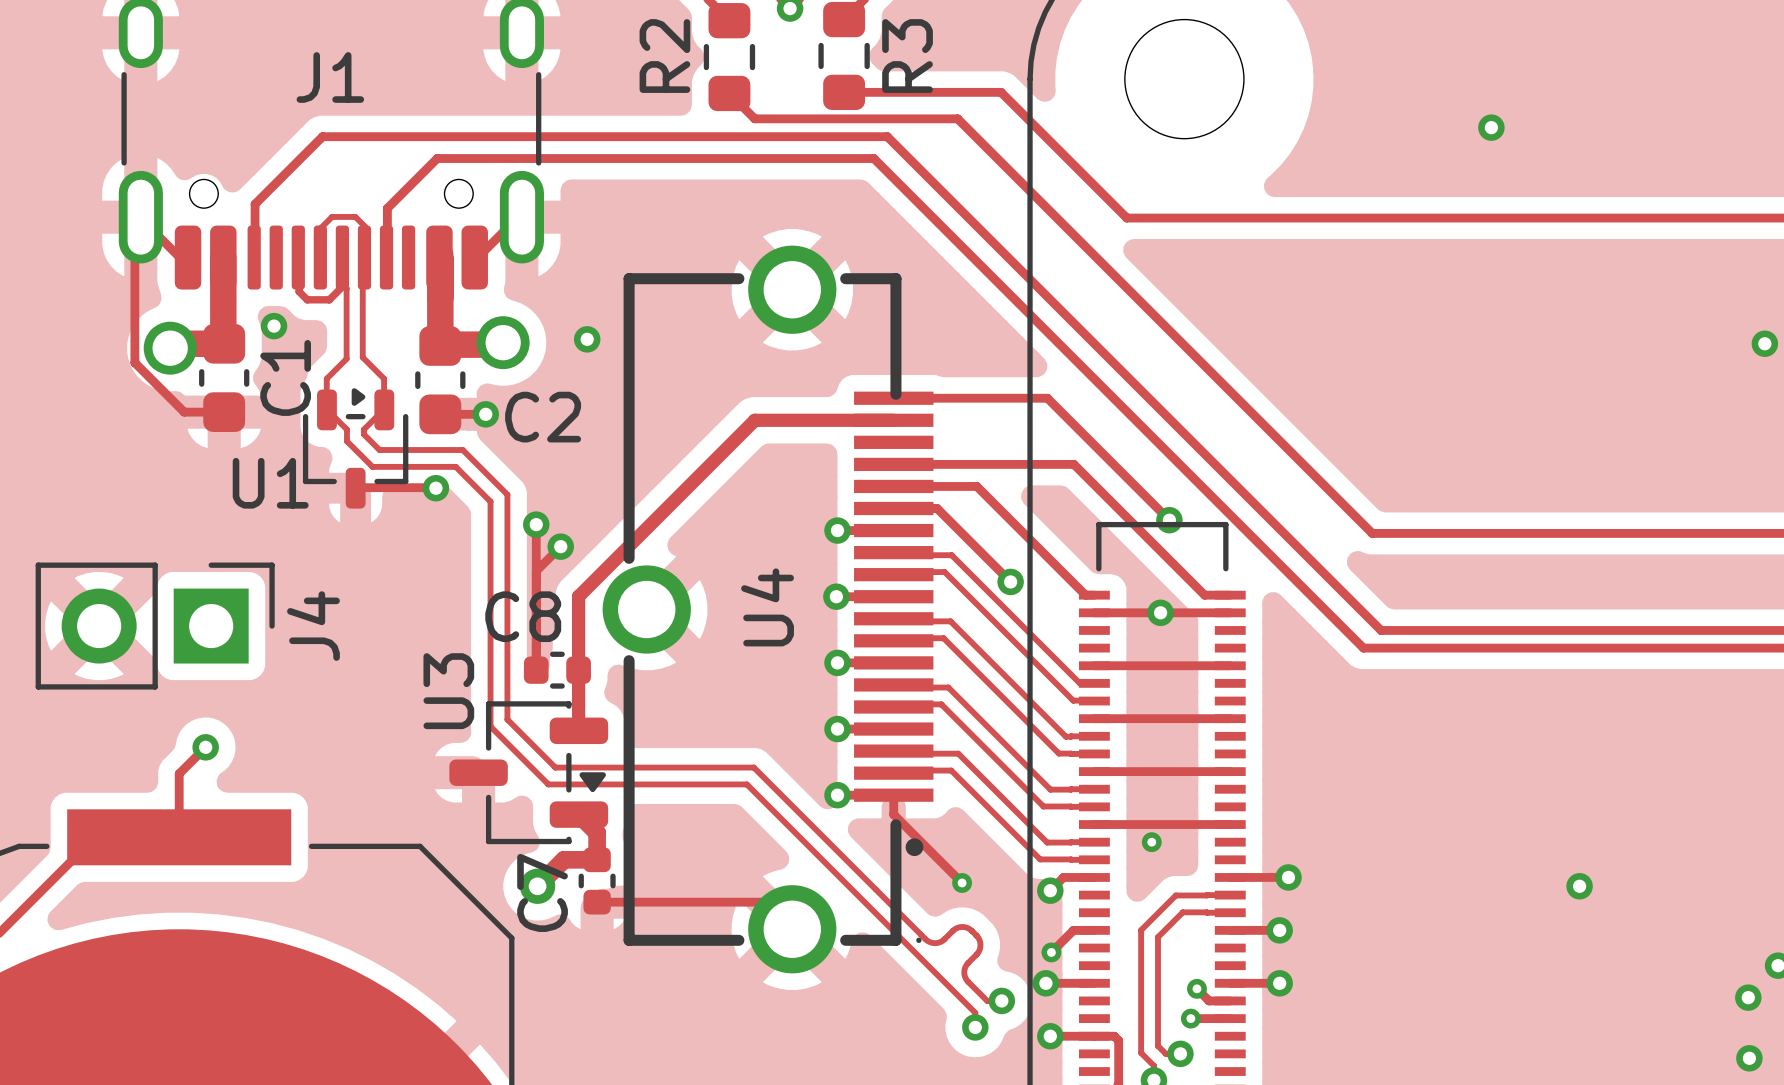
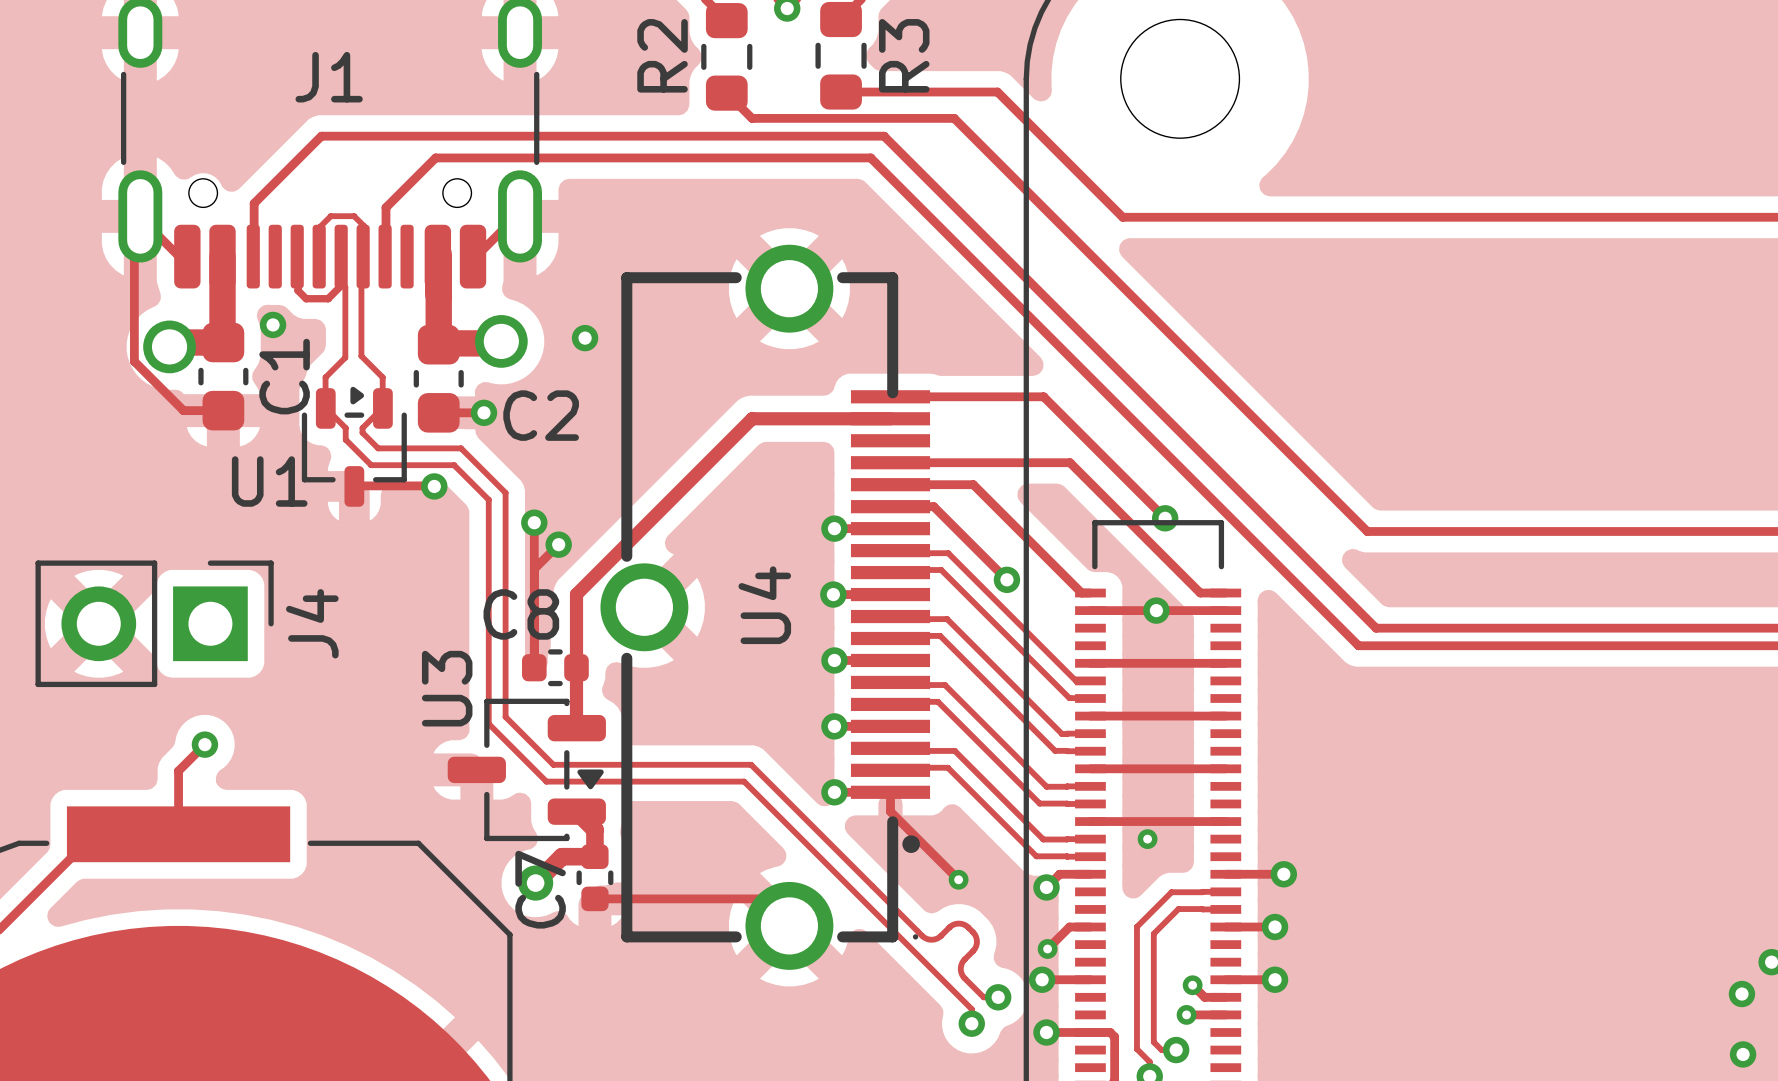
via: (1491, 127) -> none
via: (1764, 343) -> none
via: (1579, 886) -> none

